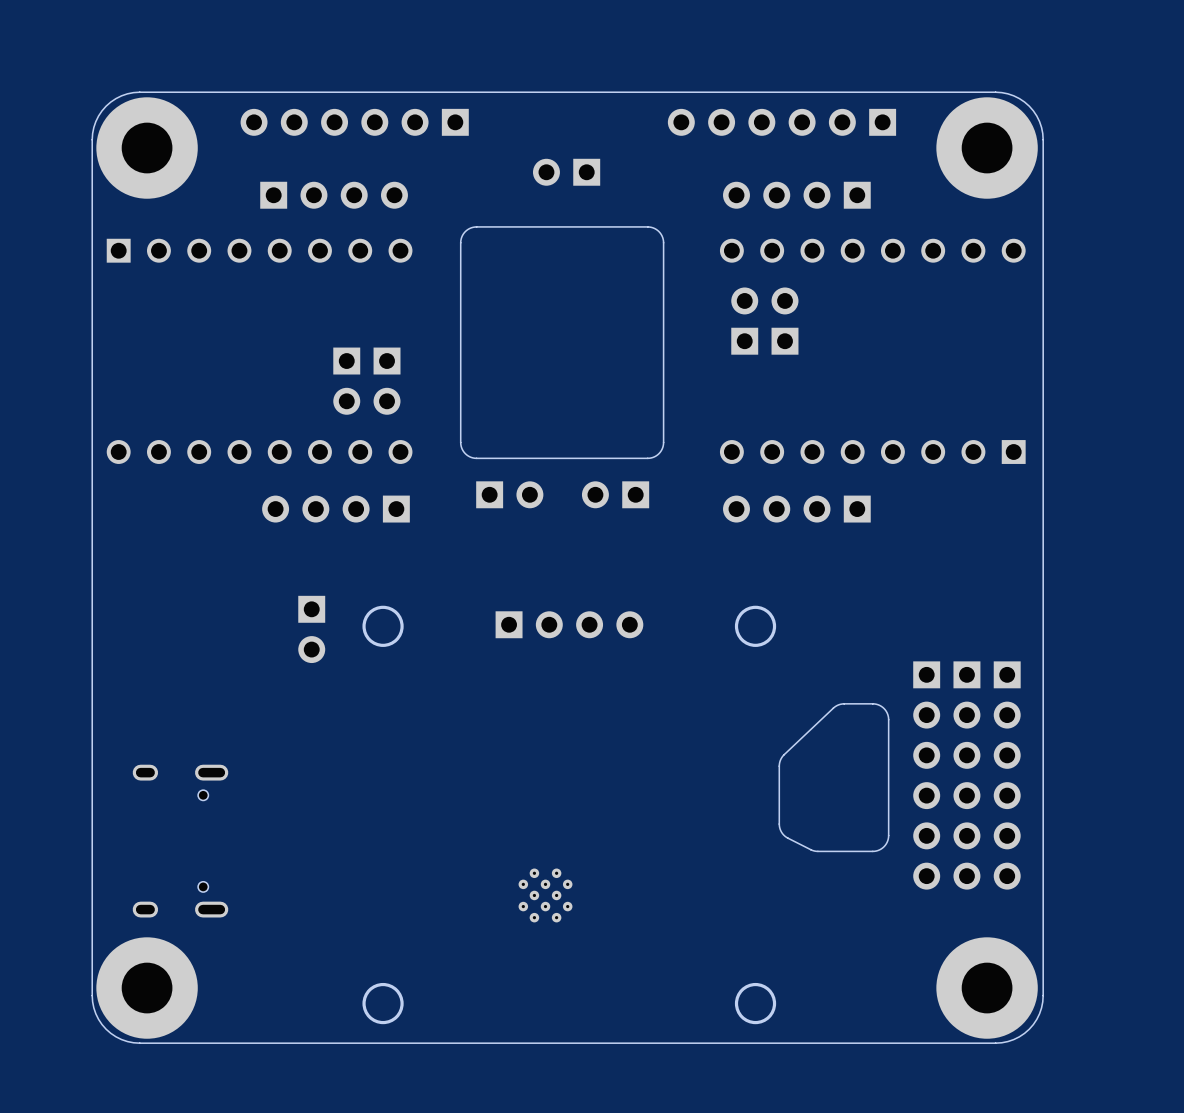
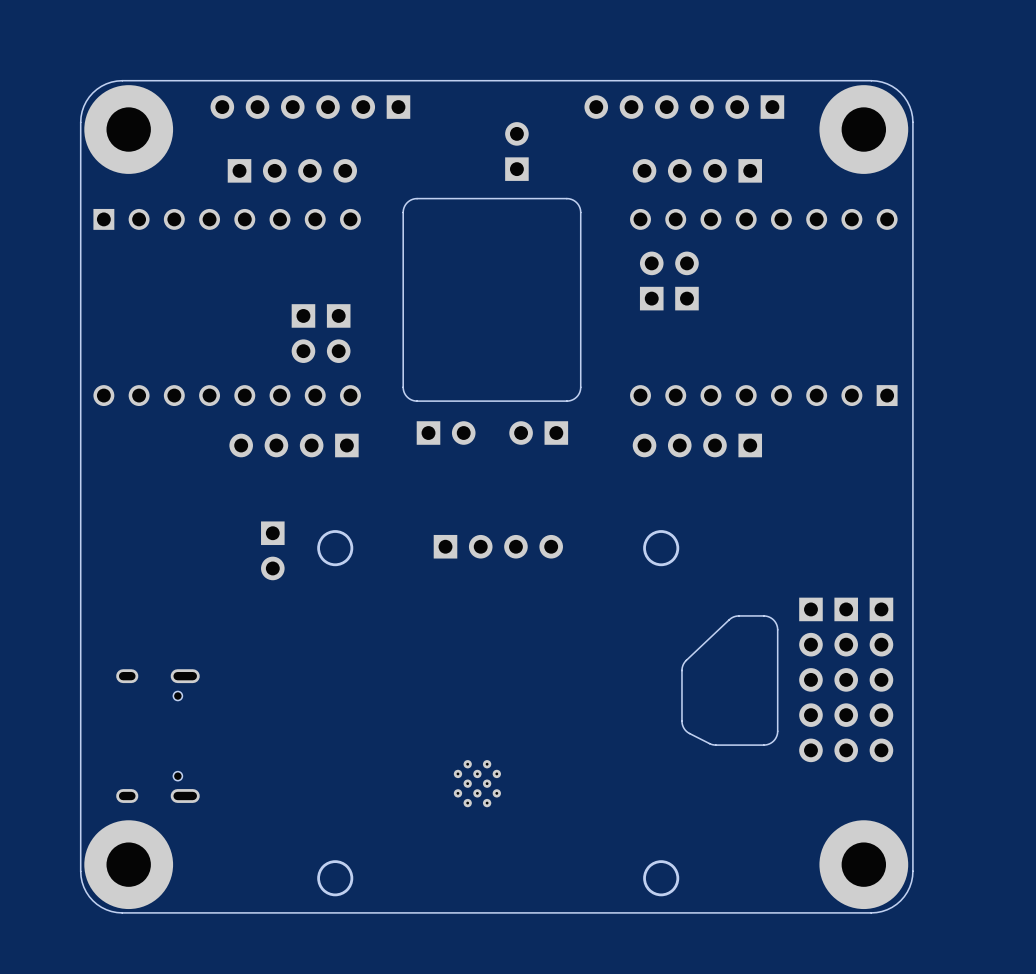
part rotation: 0° (566, 172) -> 90° clockwise (516, 151)
part footprint: [913, 661, 941, 890] -> [799, 597, 823, 763]
part footprint: [953, 661, 981, 890] -> [834, 597, 858, 763]
part footprint: [993, 661, 1021, 890] -> [869, 597, 894, 763]

